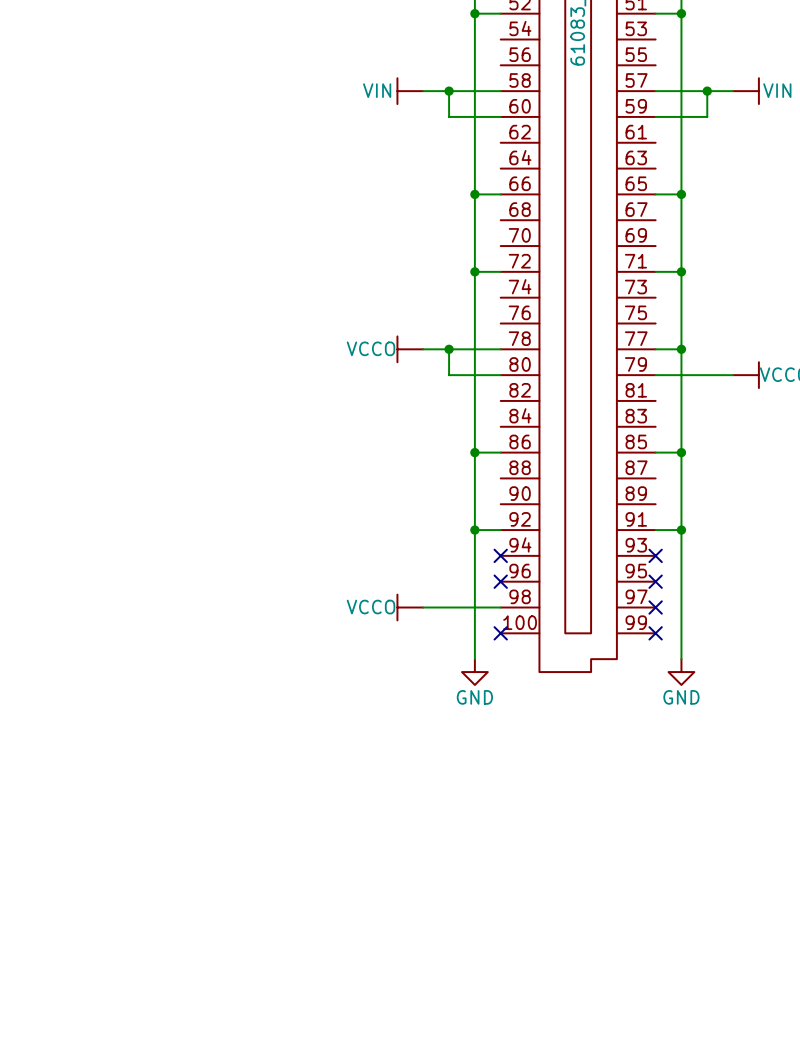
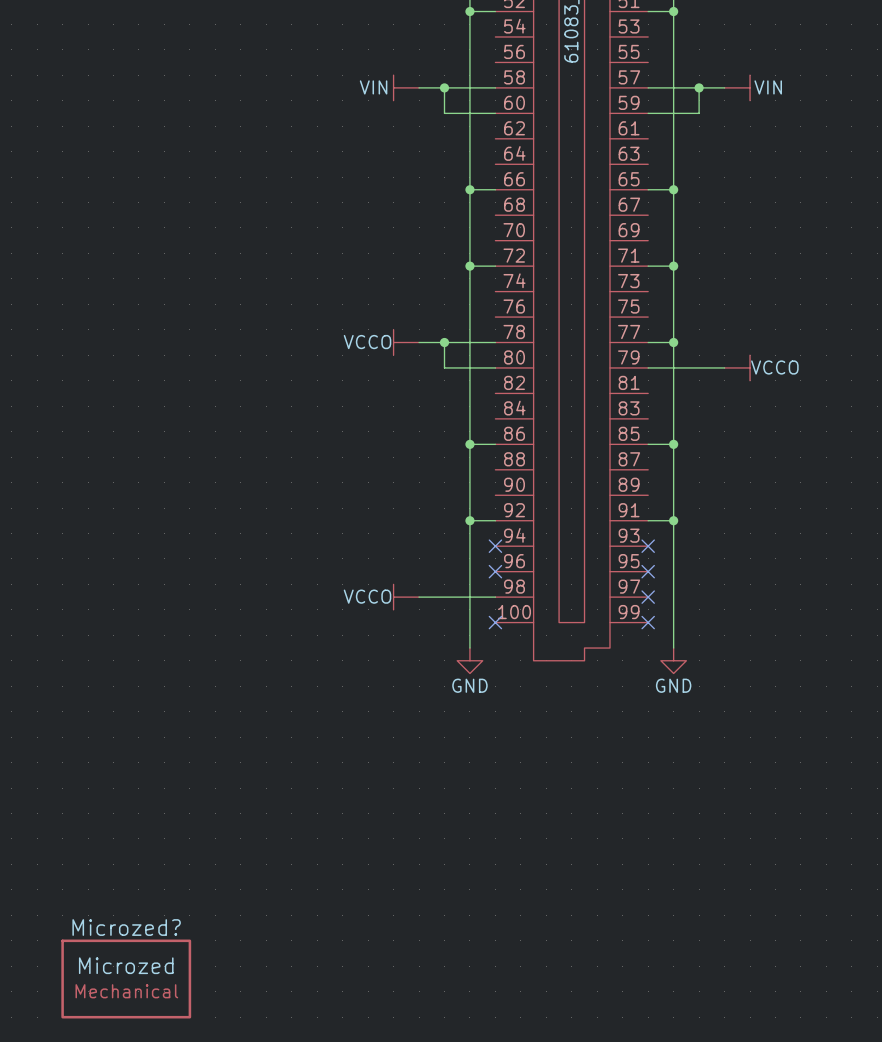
Microzed?: none -> Microzed (126, 979)

